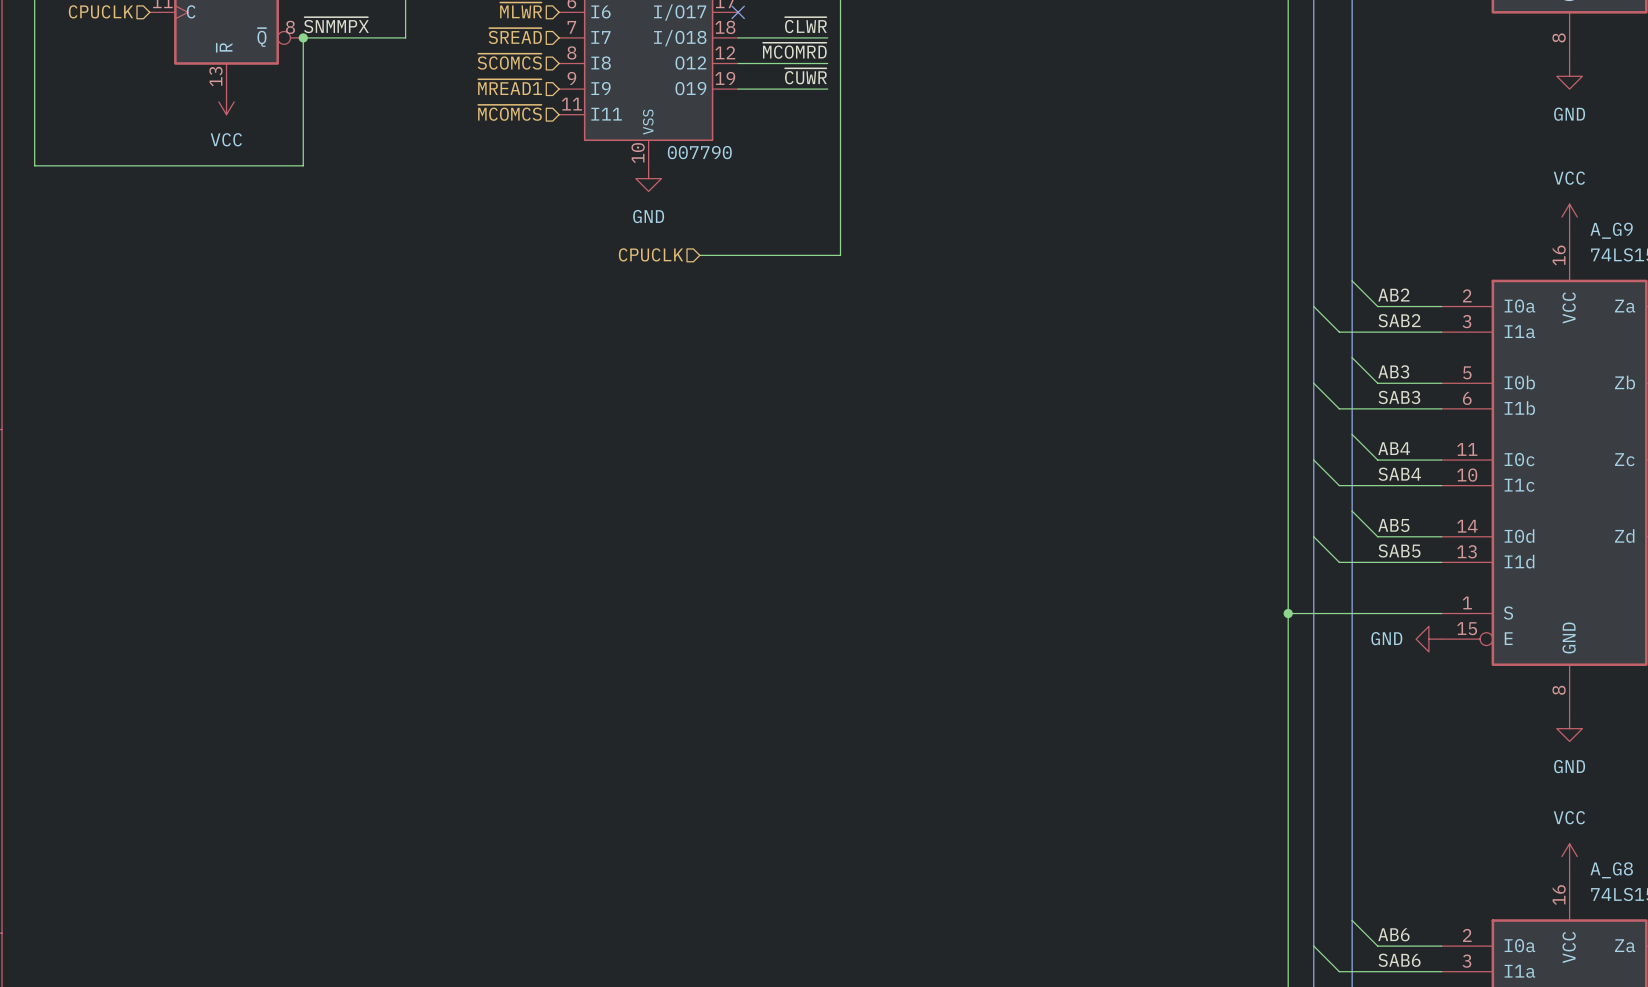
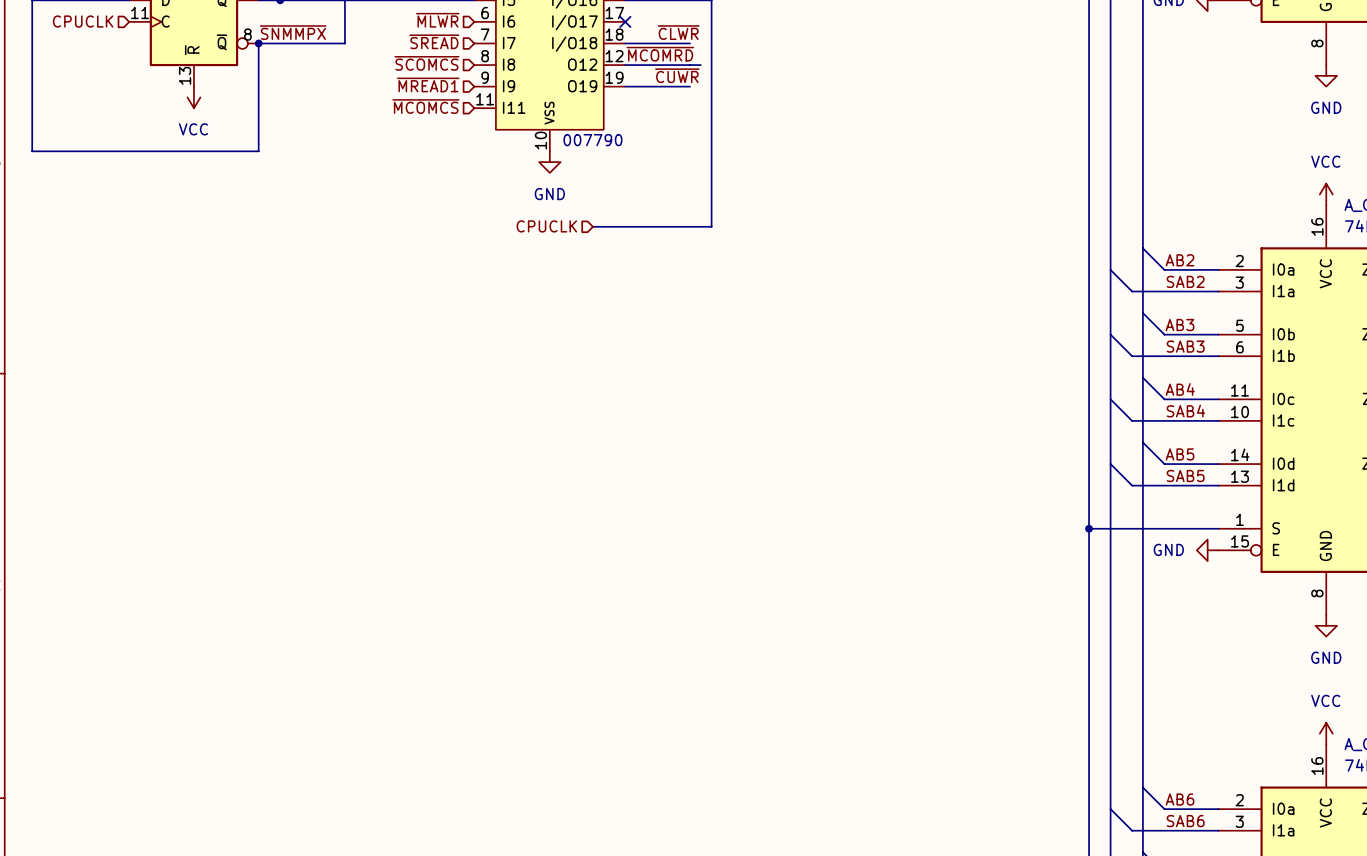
wire: (814, 37) (827, 37) -> none
label position: ~{MCOMRD} (794, 50) -> ~{MCOMRD} (660, 54)
wire: (814, 89) (827, 89) -> none

